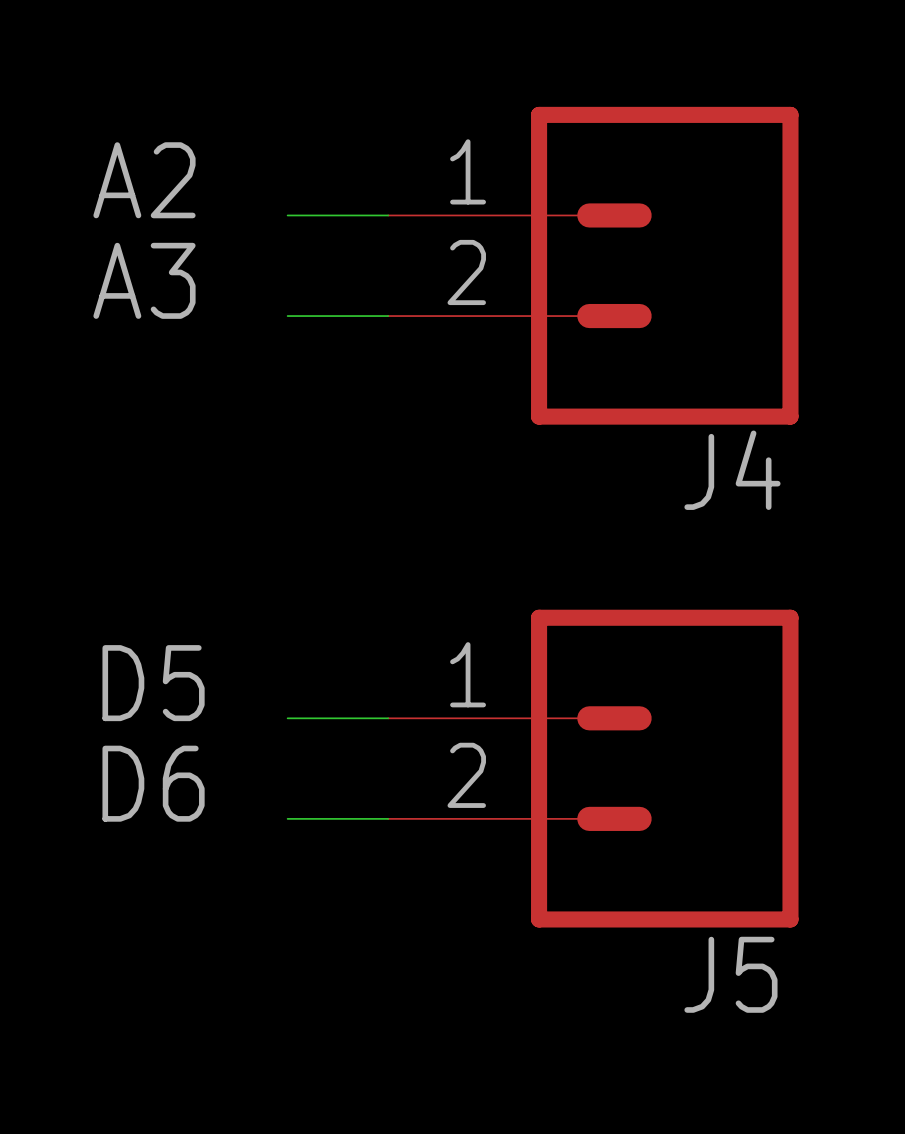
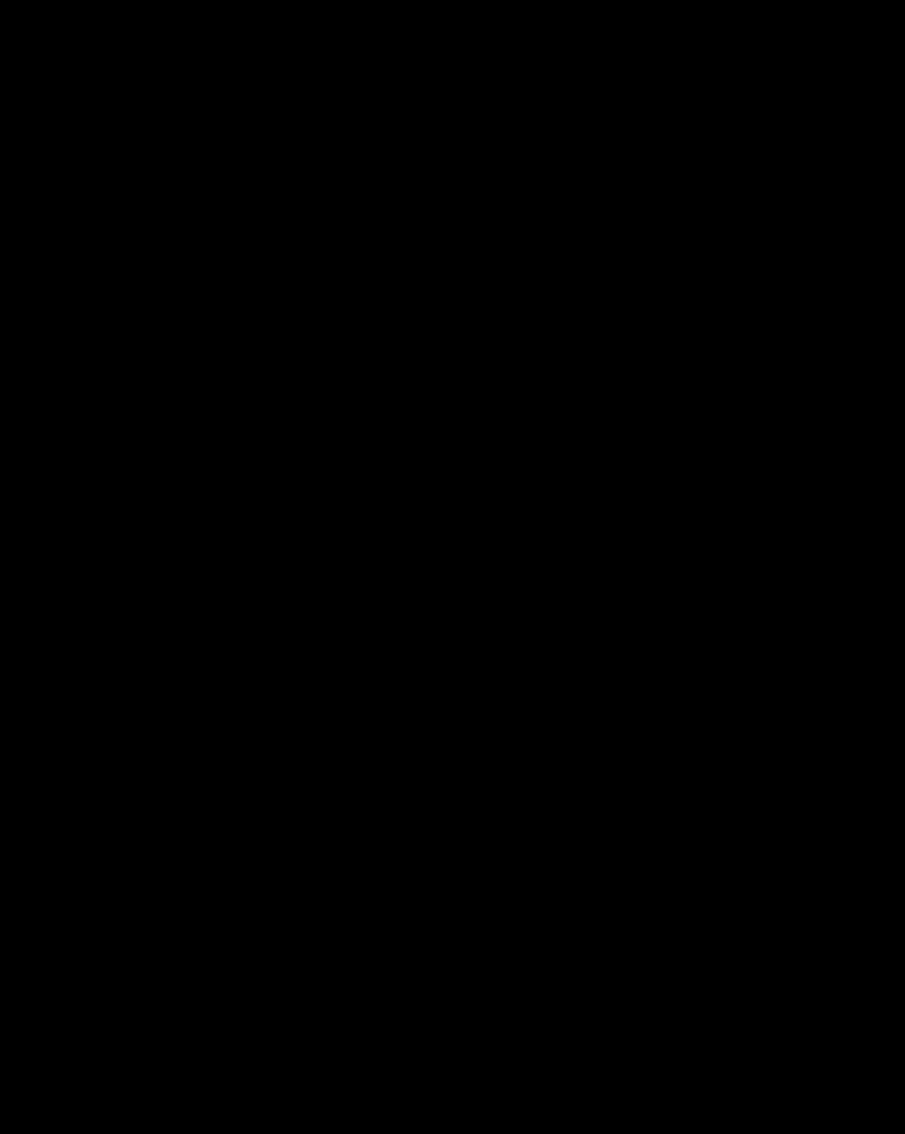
label: A2 (144, 180) -> none
wire: (287, 215) (388, 215) -> none
J4: (593, 265) -> none
label: A3 (144, 280) -> none
wire: (287, 316) (388, 316) -> none
label: D5 (153, 683) -> none
wire: (287, 718) (388, 718) -> none
J5: (593, 768) -> none
label: D6 (153, 783) -> none
wire: (287, 818) (388, 818) -> none

